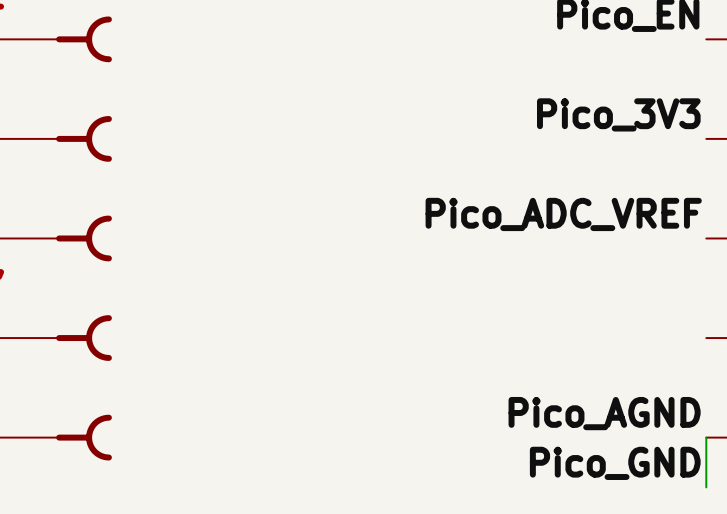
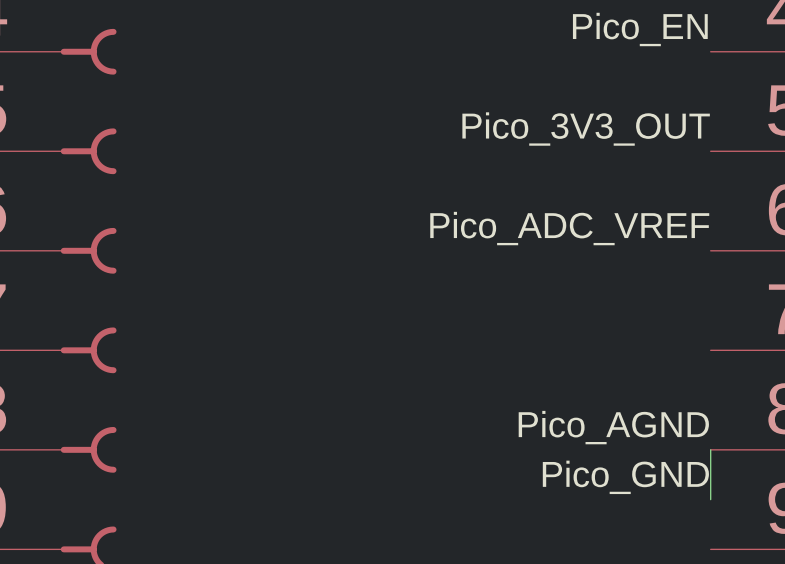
label: Pico_3V3 (618, 114) -> Pico_3V3_OUT (586, 129)

